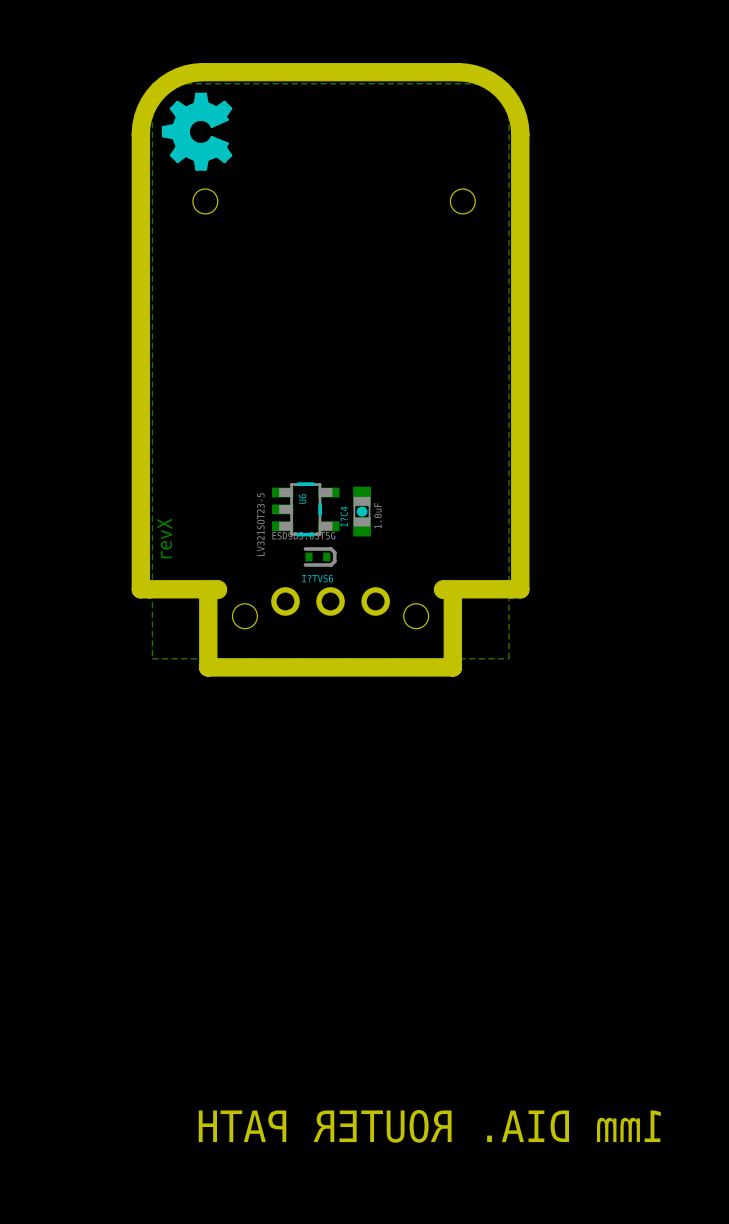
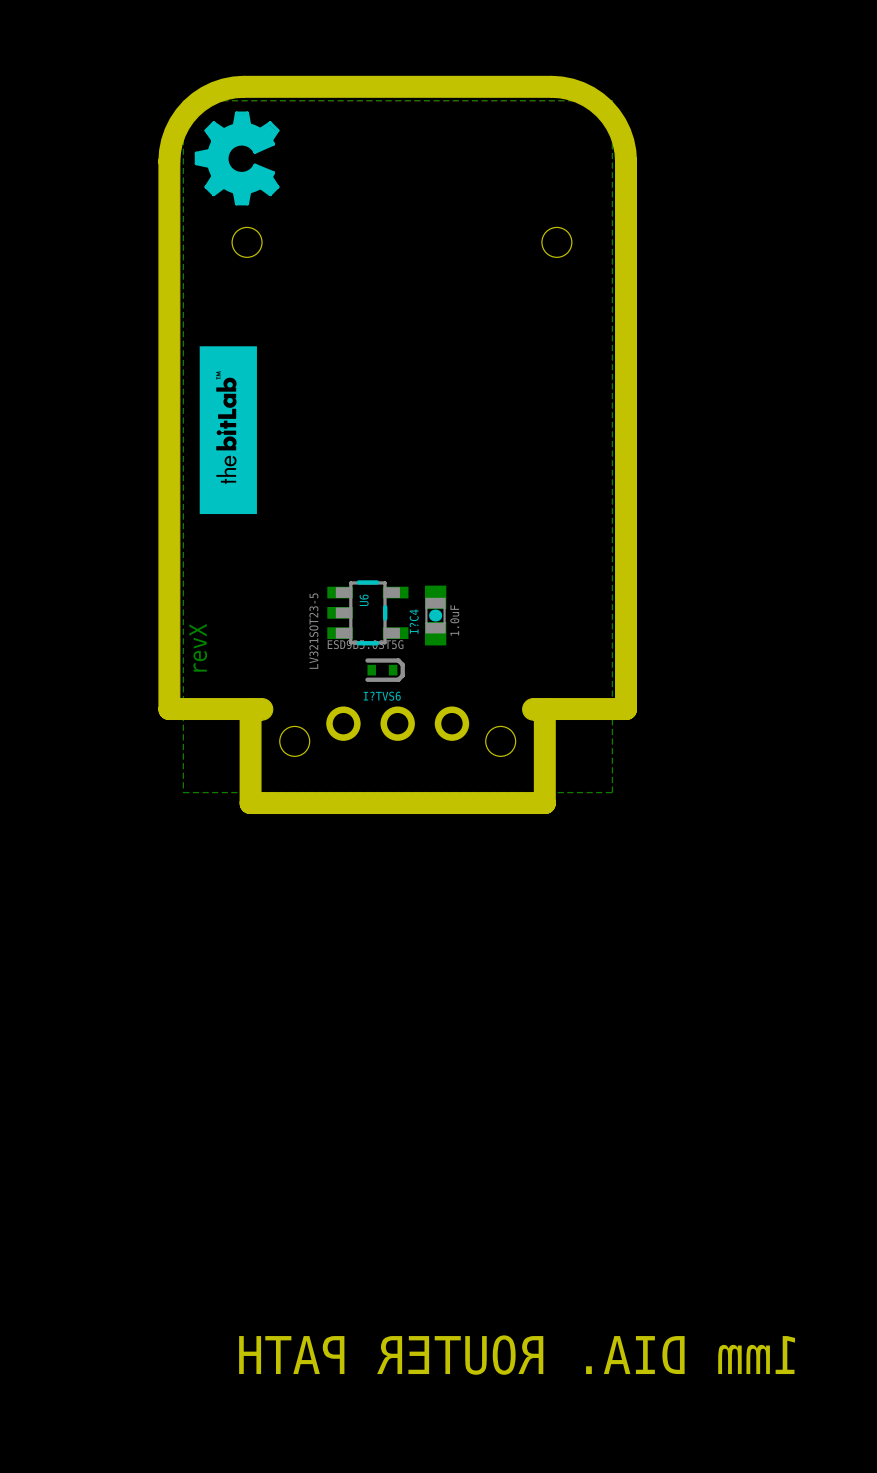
drawing: none -> [199, 346, 257, 515]

